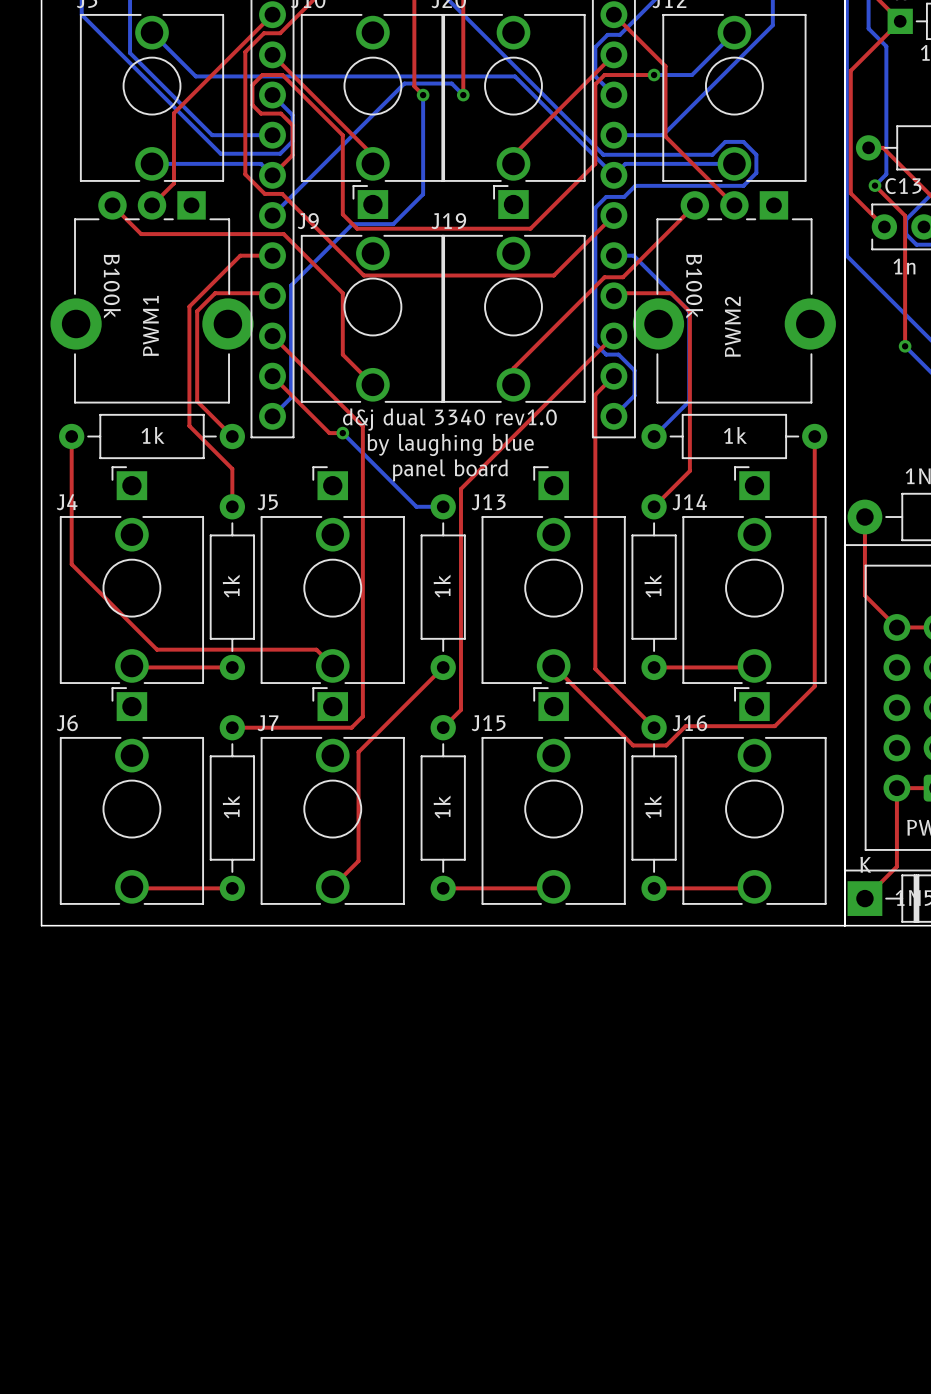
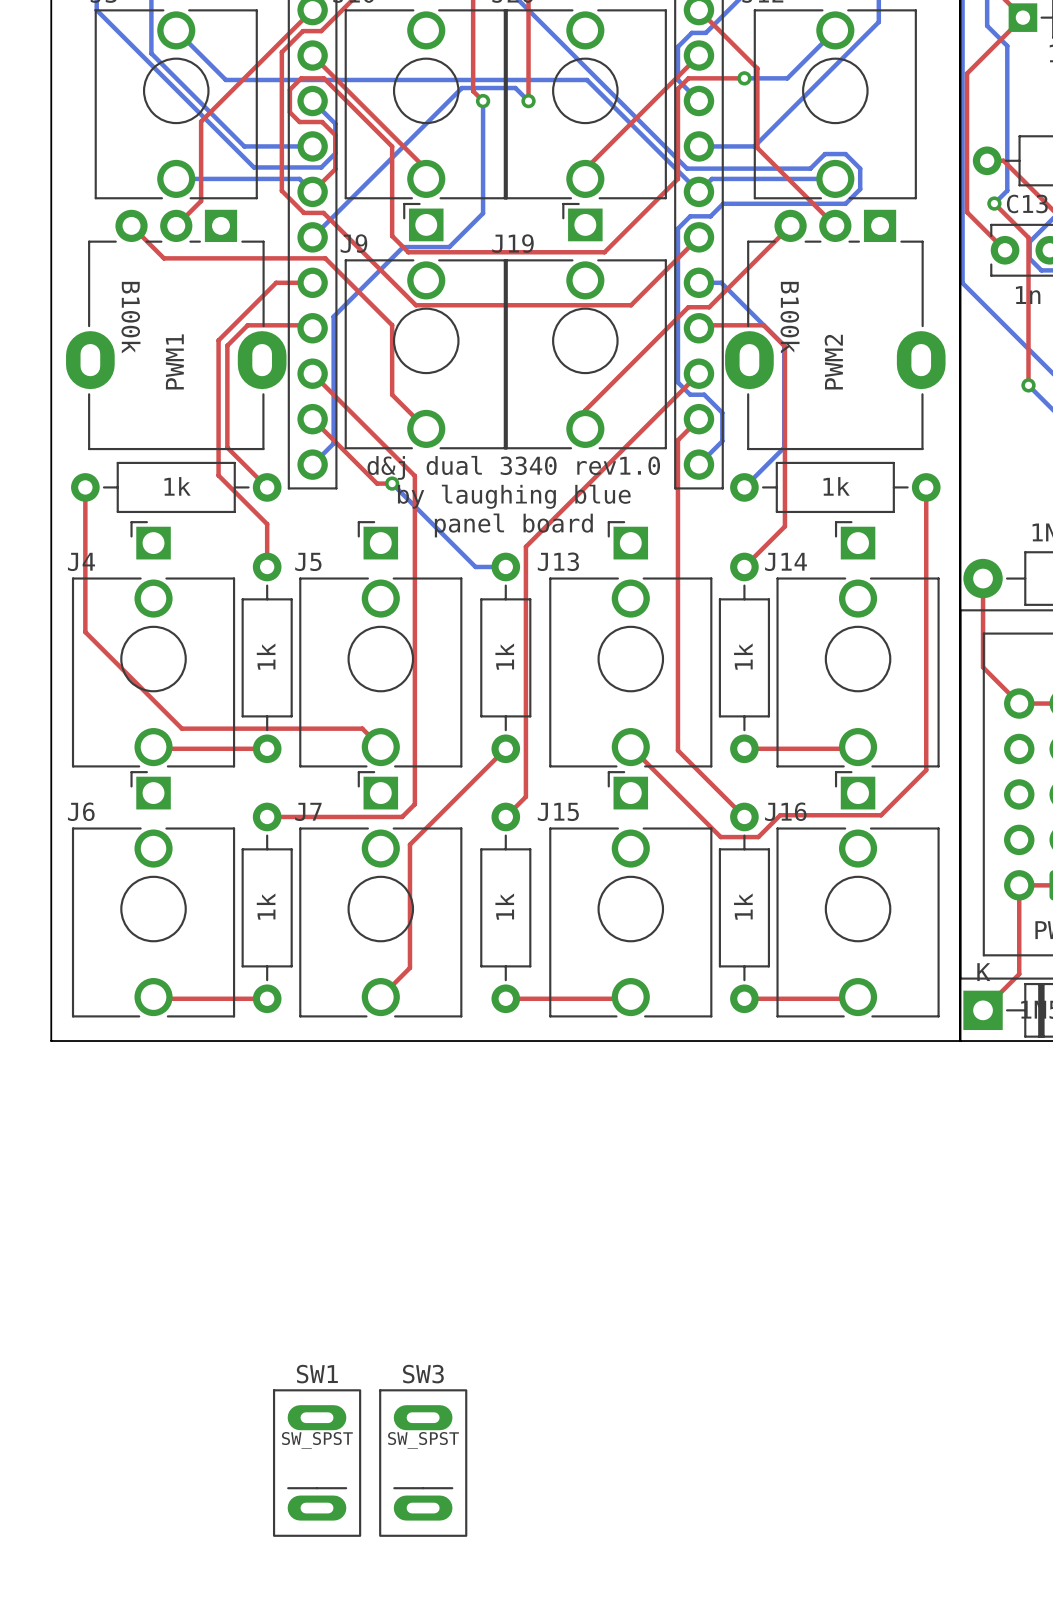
PWM1 footprint: [50, 191, 254, 404] -> [66, 209, 287, 451]
PWM2 footprint: [632, 191, 836, 404] -> [725, 209, 946, 451]
SW1: none -> SW_SPST (317, 1463)
SW3: none -> SW_SPST (423, 1463)

